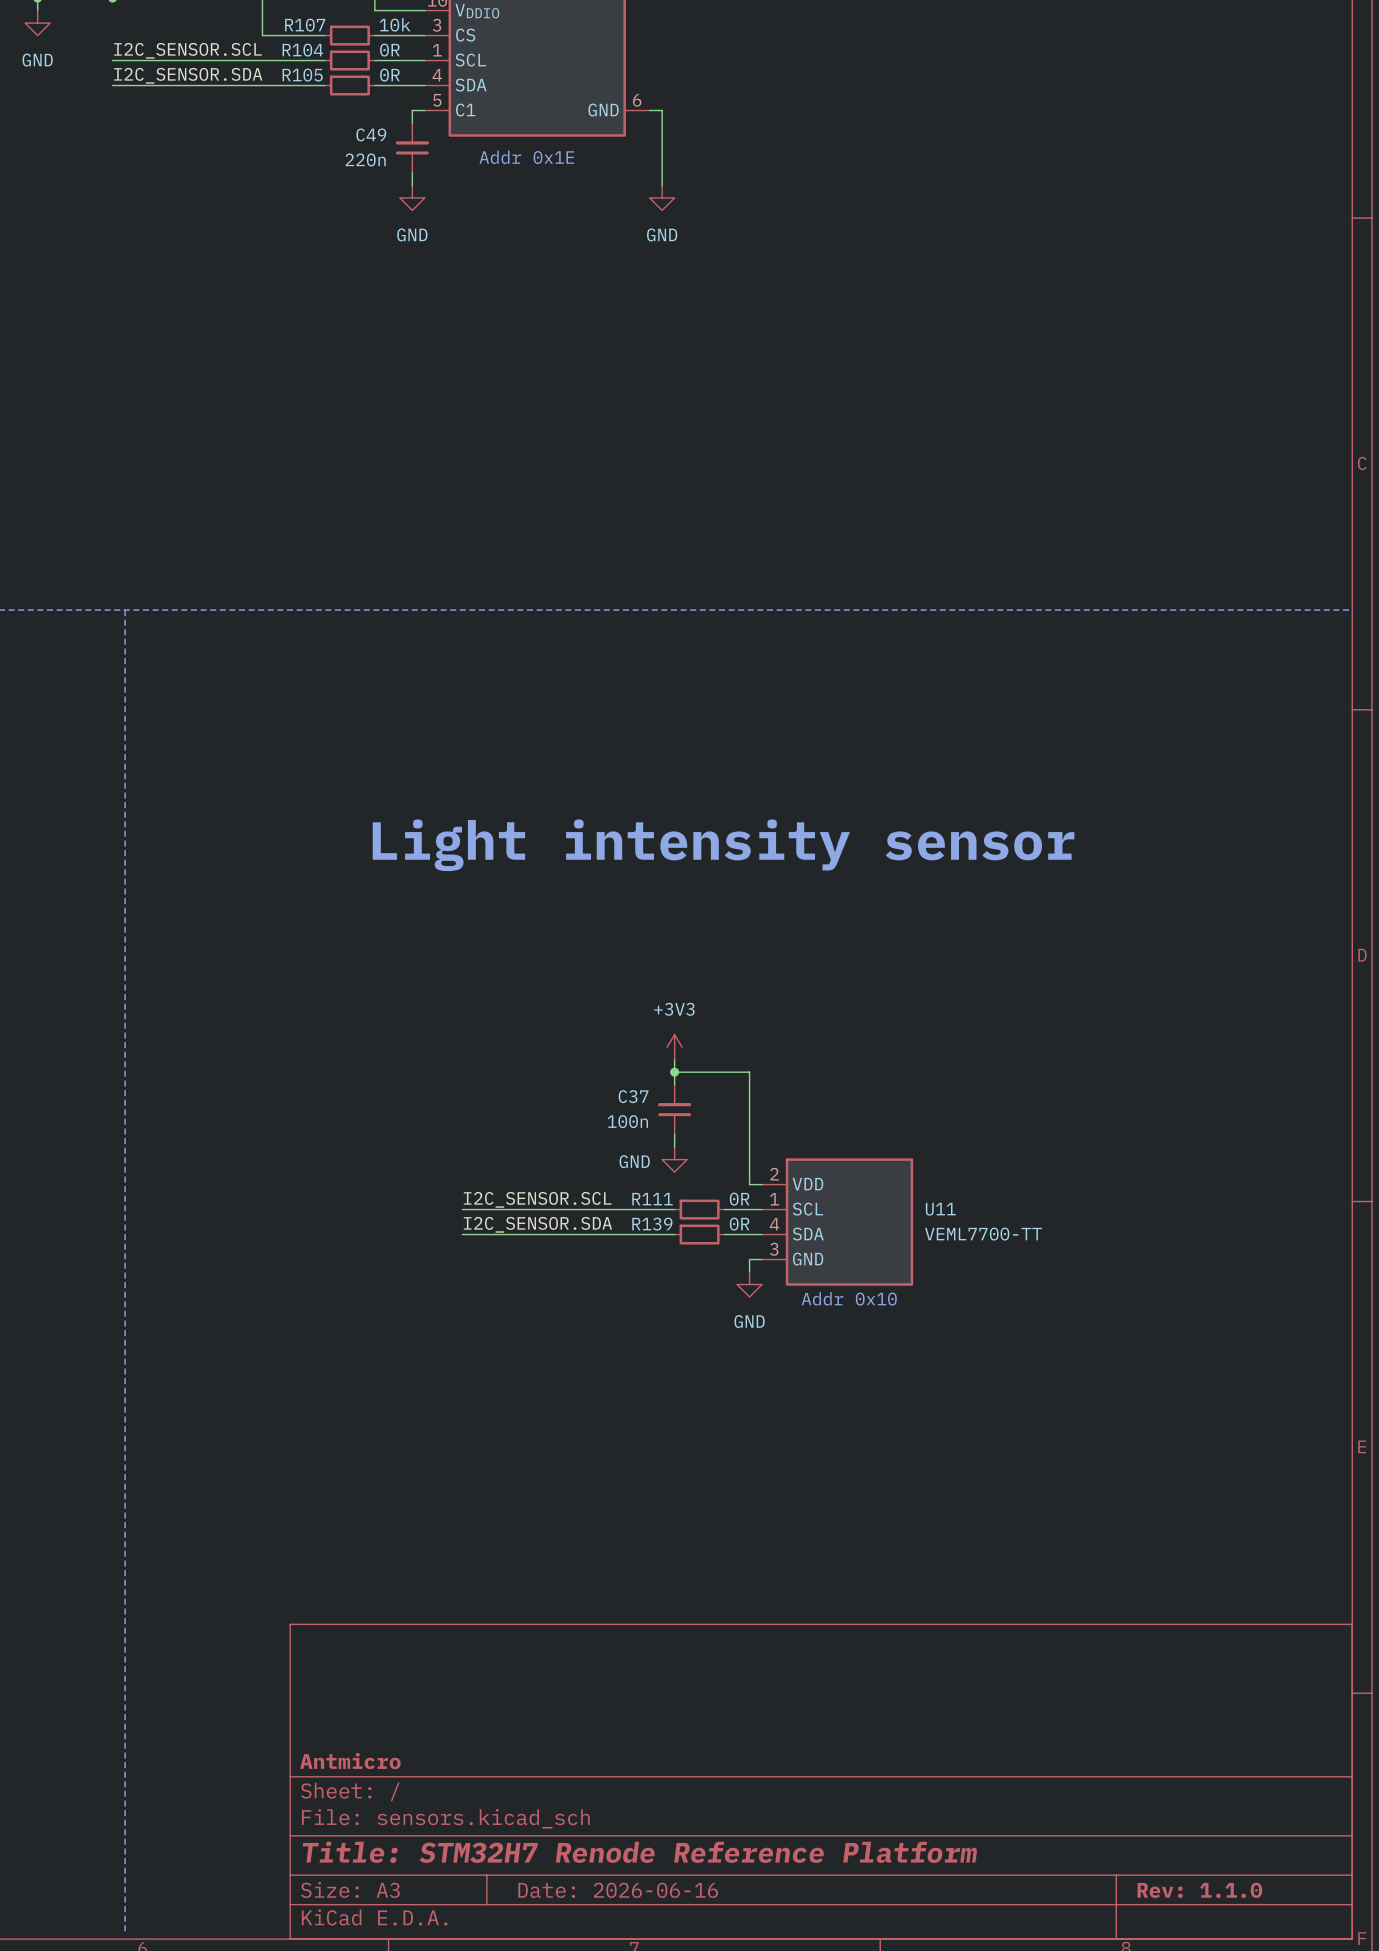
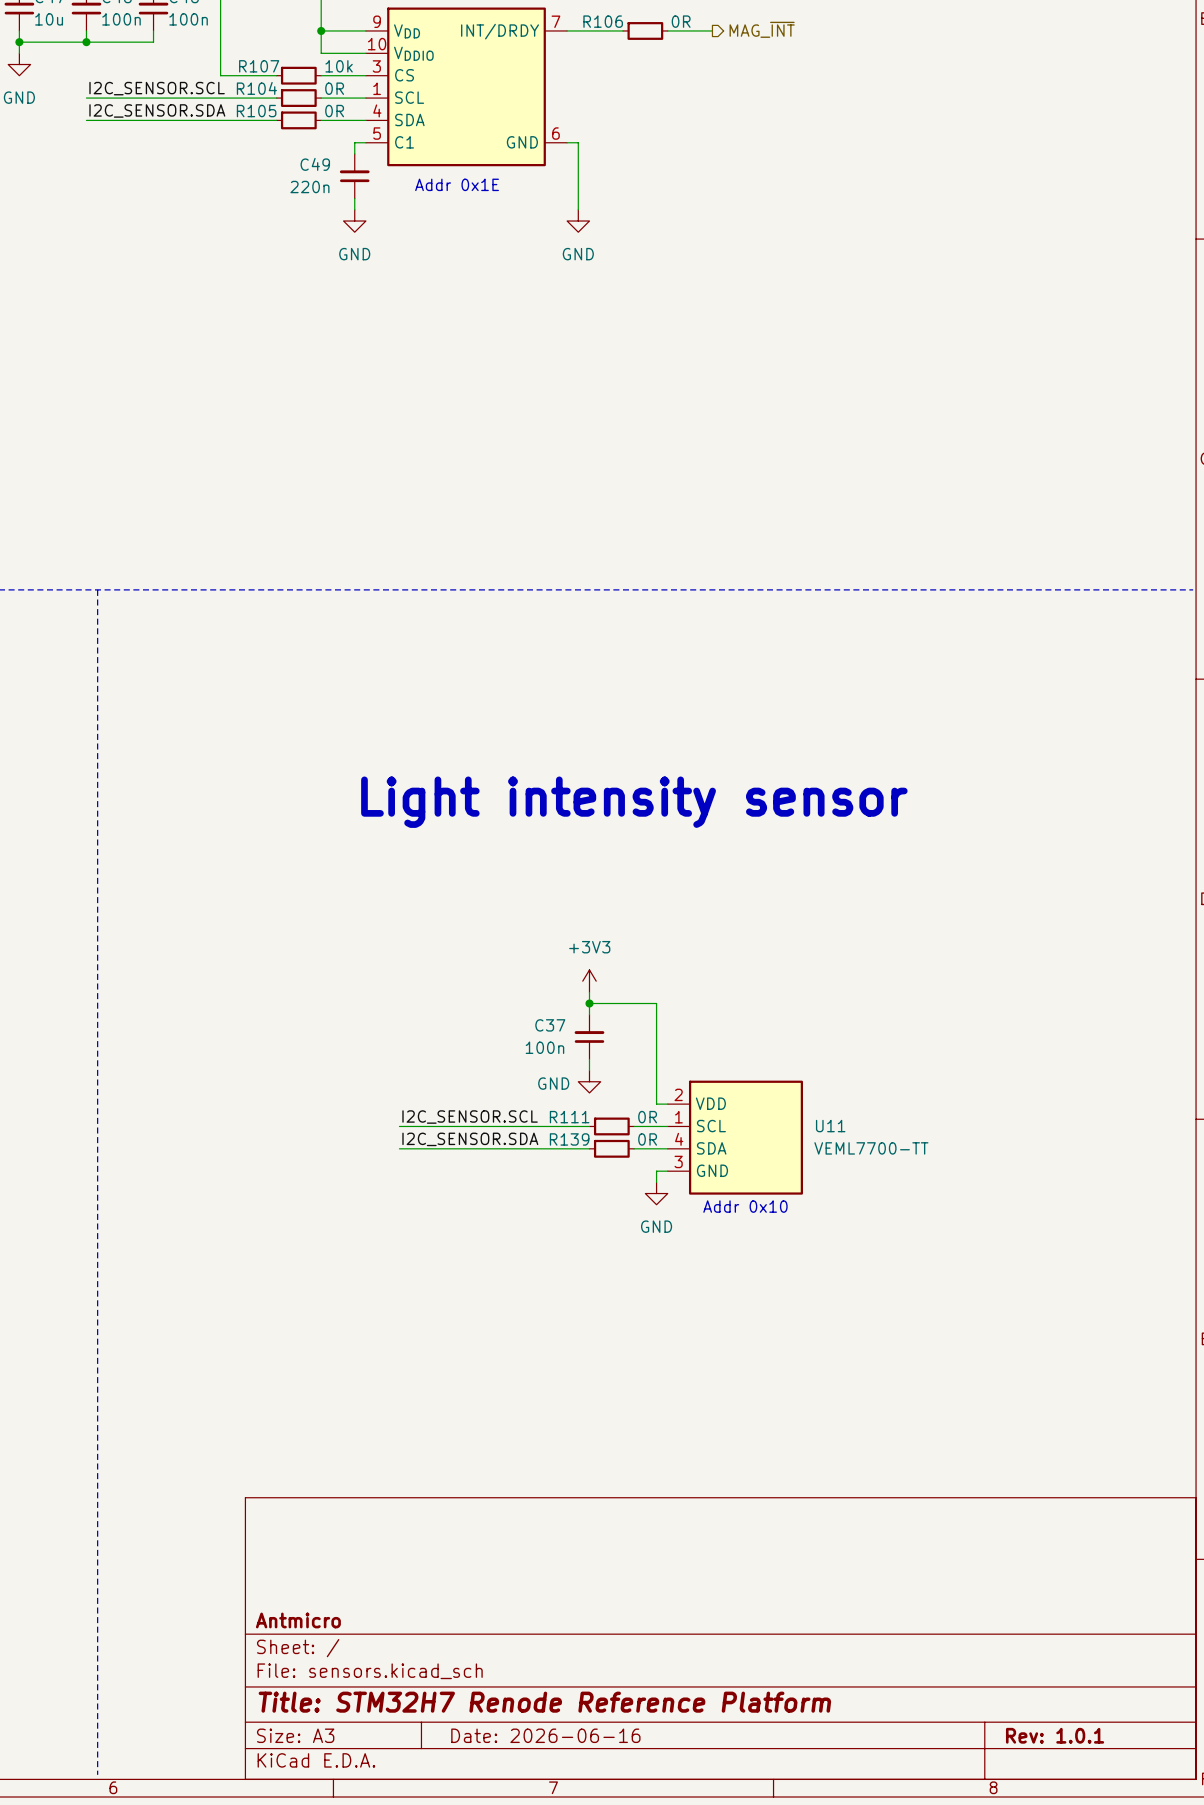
title block: Rev: 1.1.0 (1199, 1890) -> Rev: 1.0.1 (1055, 1735)

